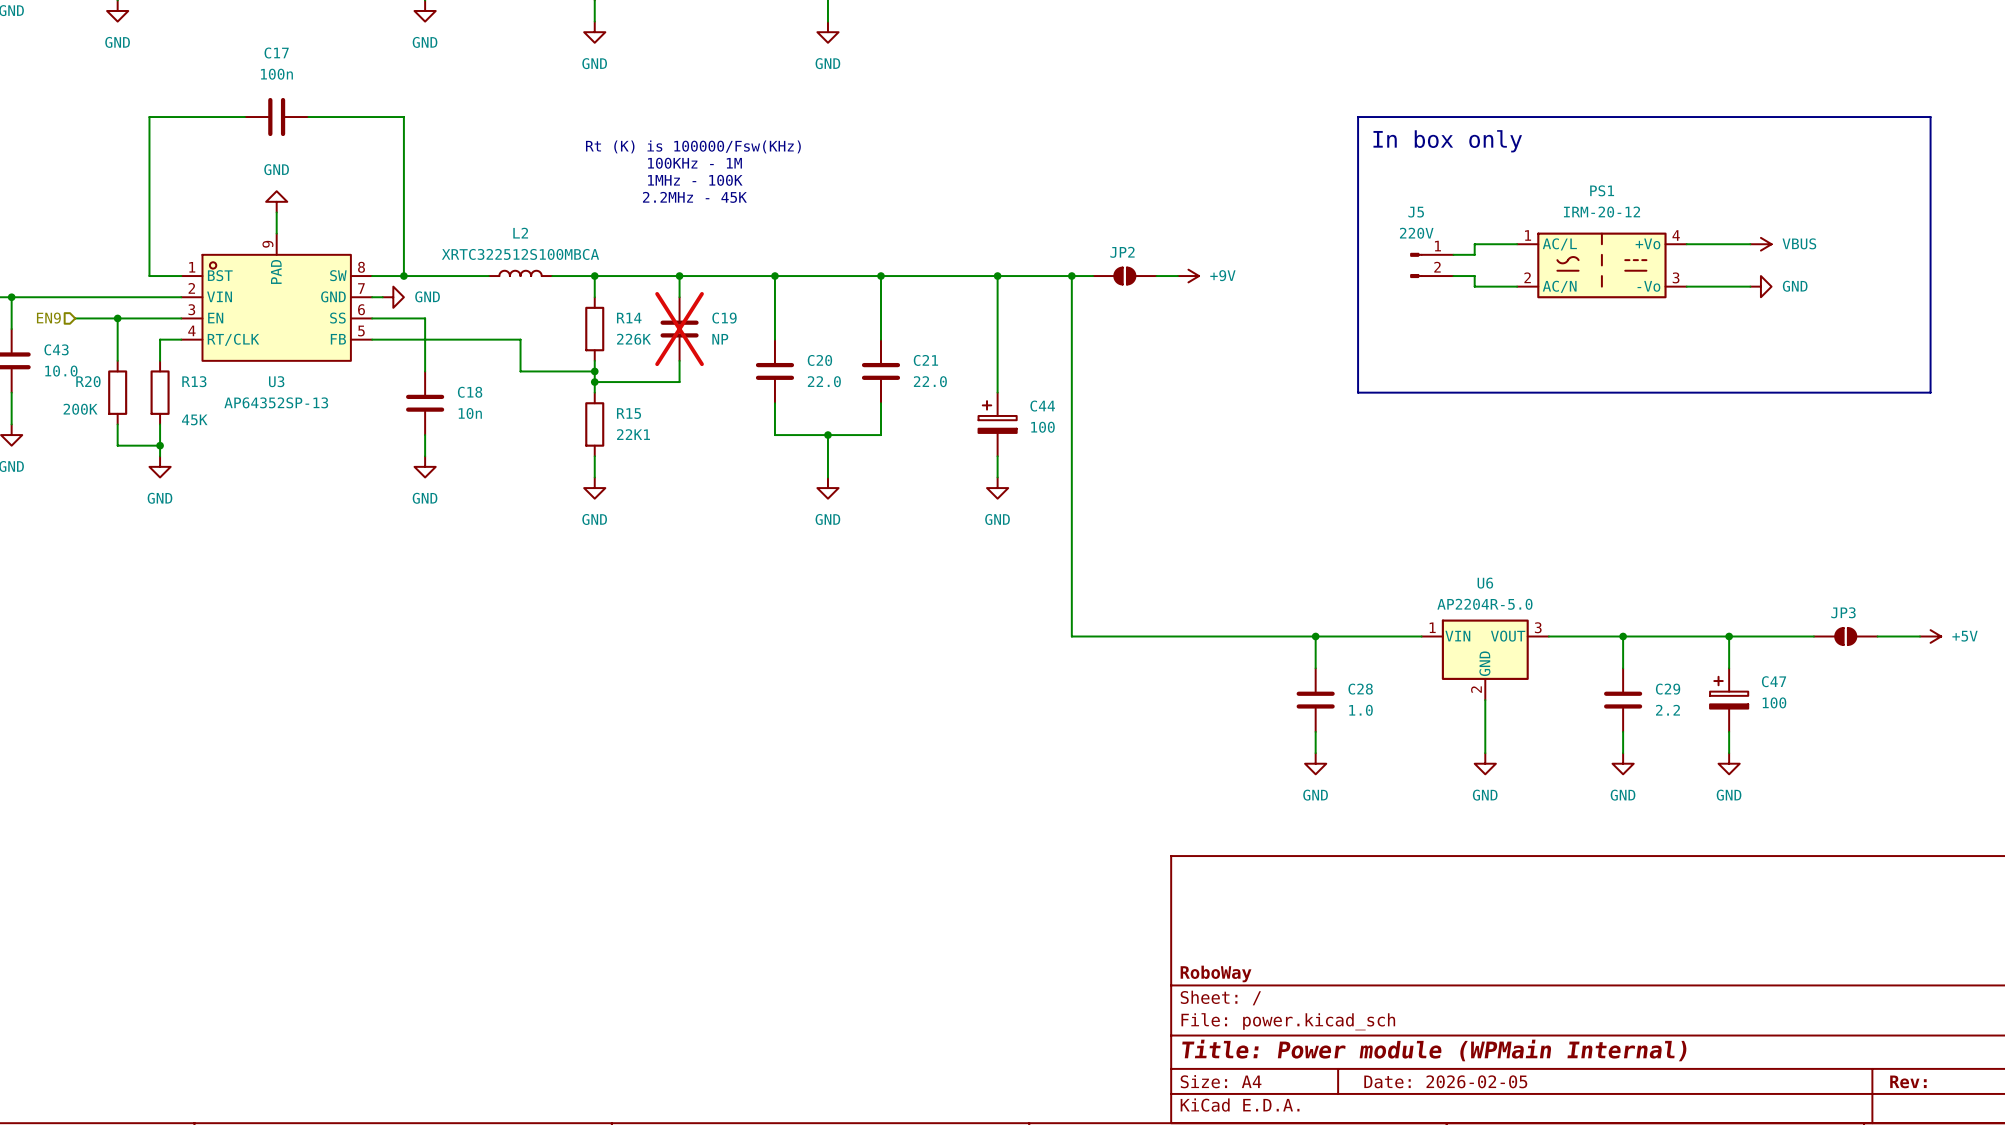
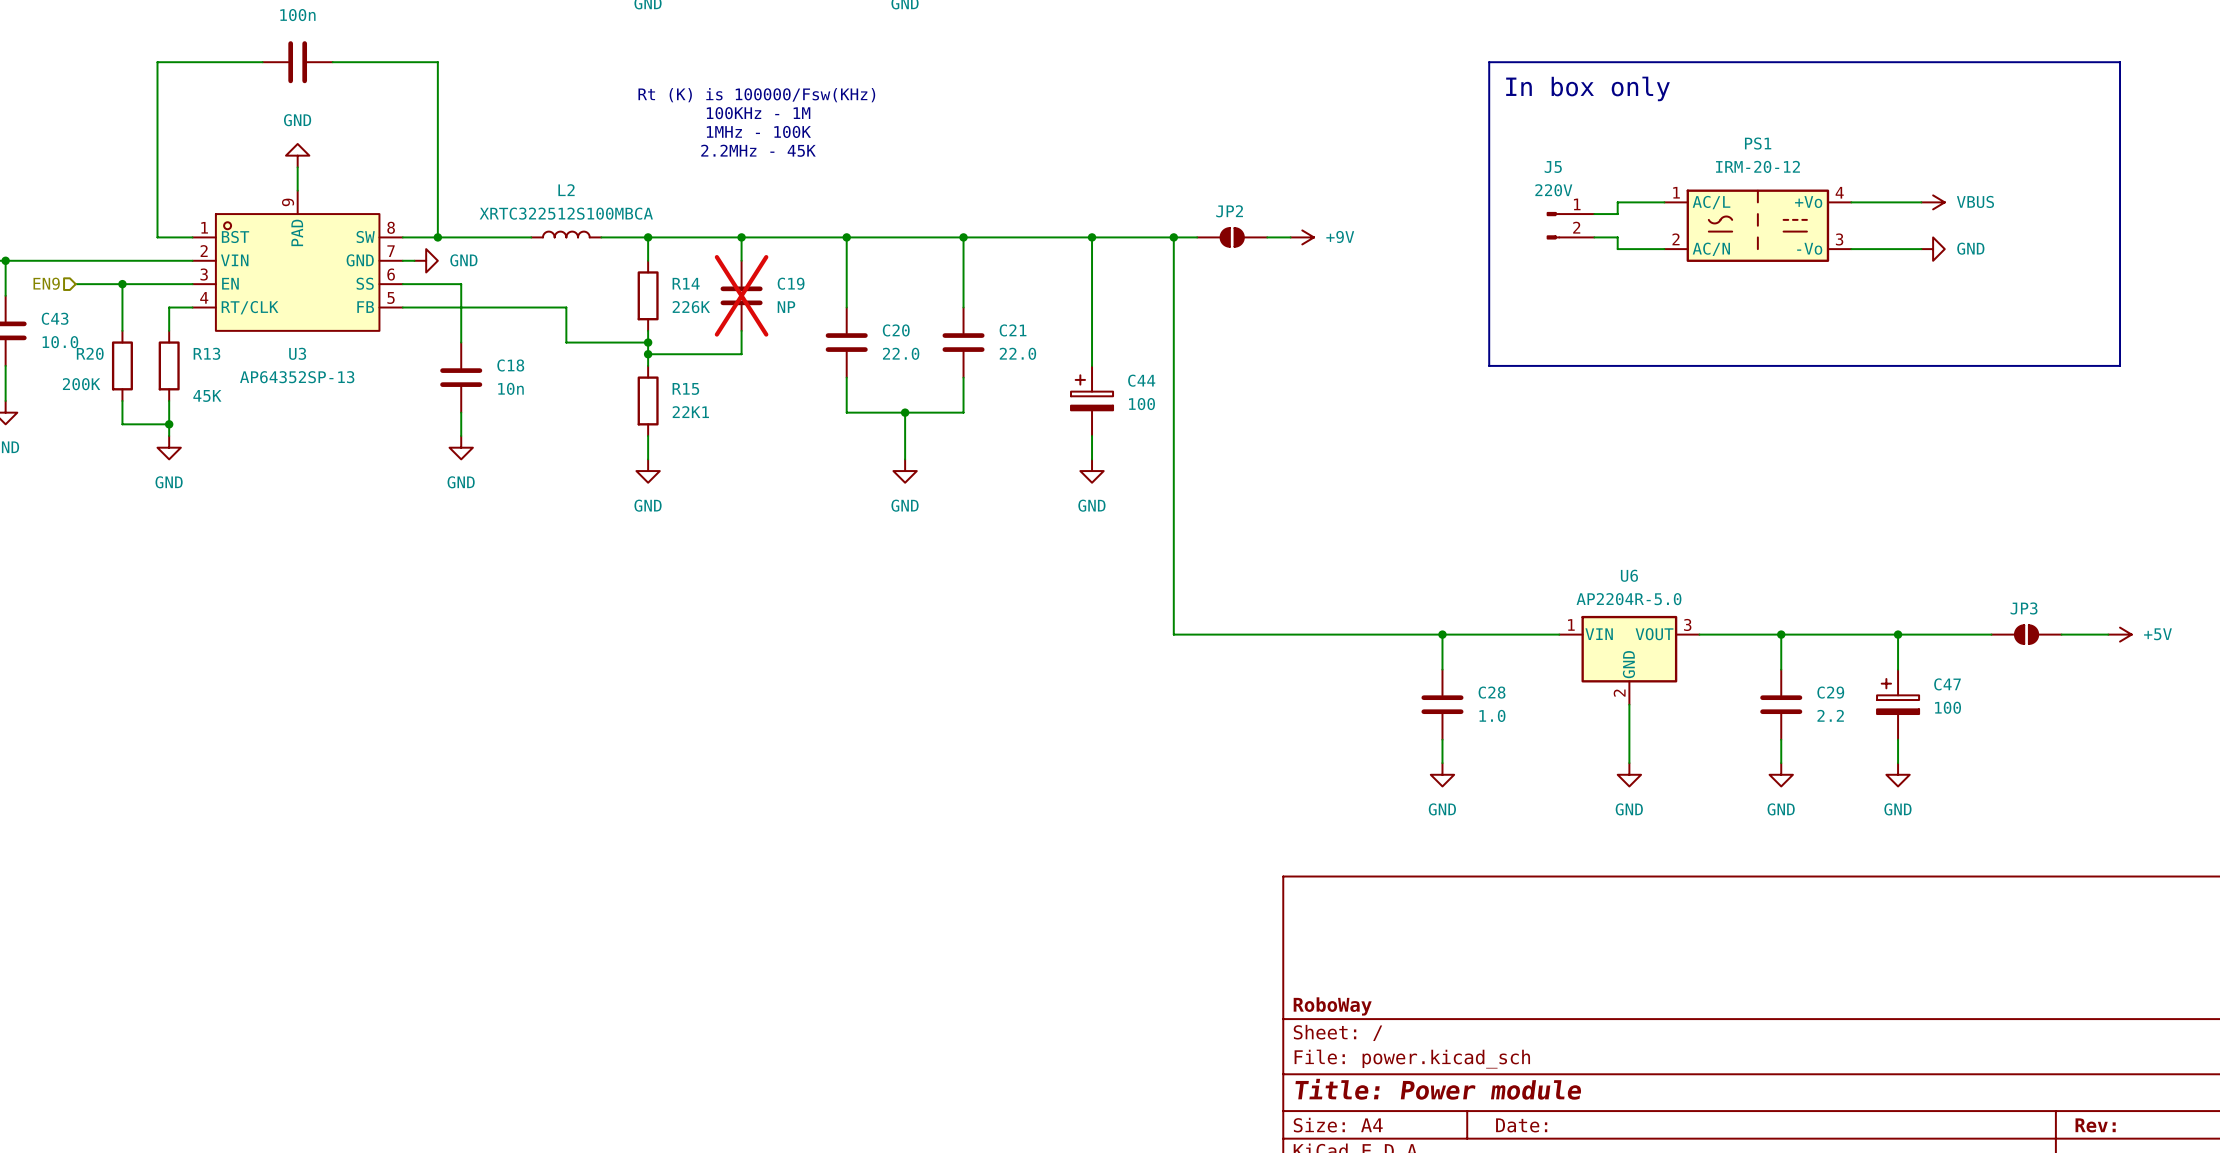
title block: Title: Power module (WPMain Internal) (1434, 1050) -> Title: Power module (1438, 1089)
title block: Date: 2026-02-05 (1445, 1081) -> Date: (1521, 1125)

